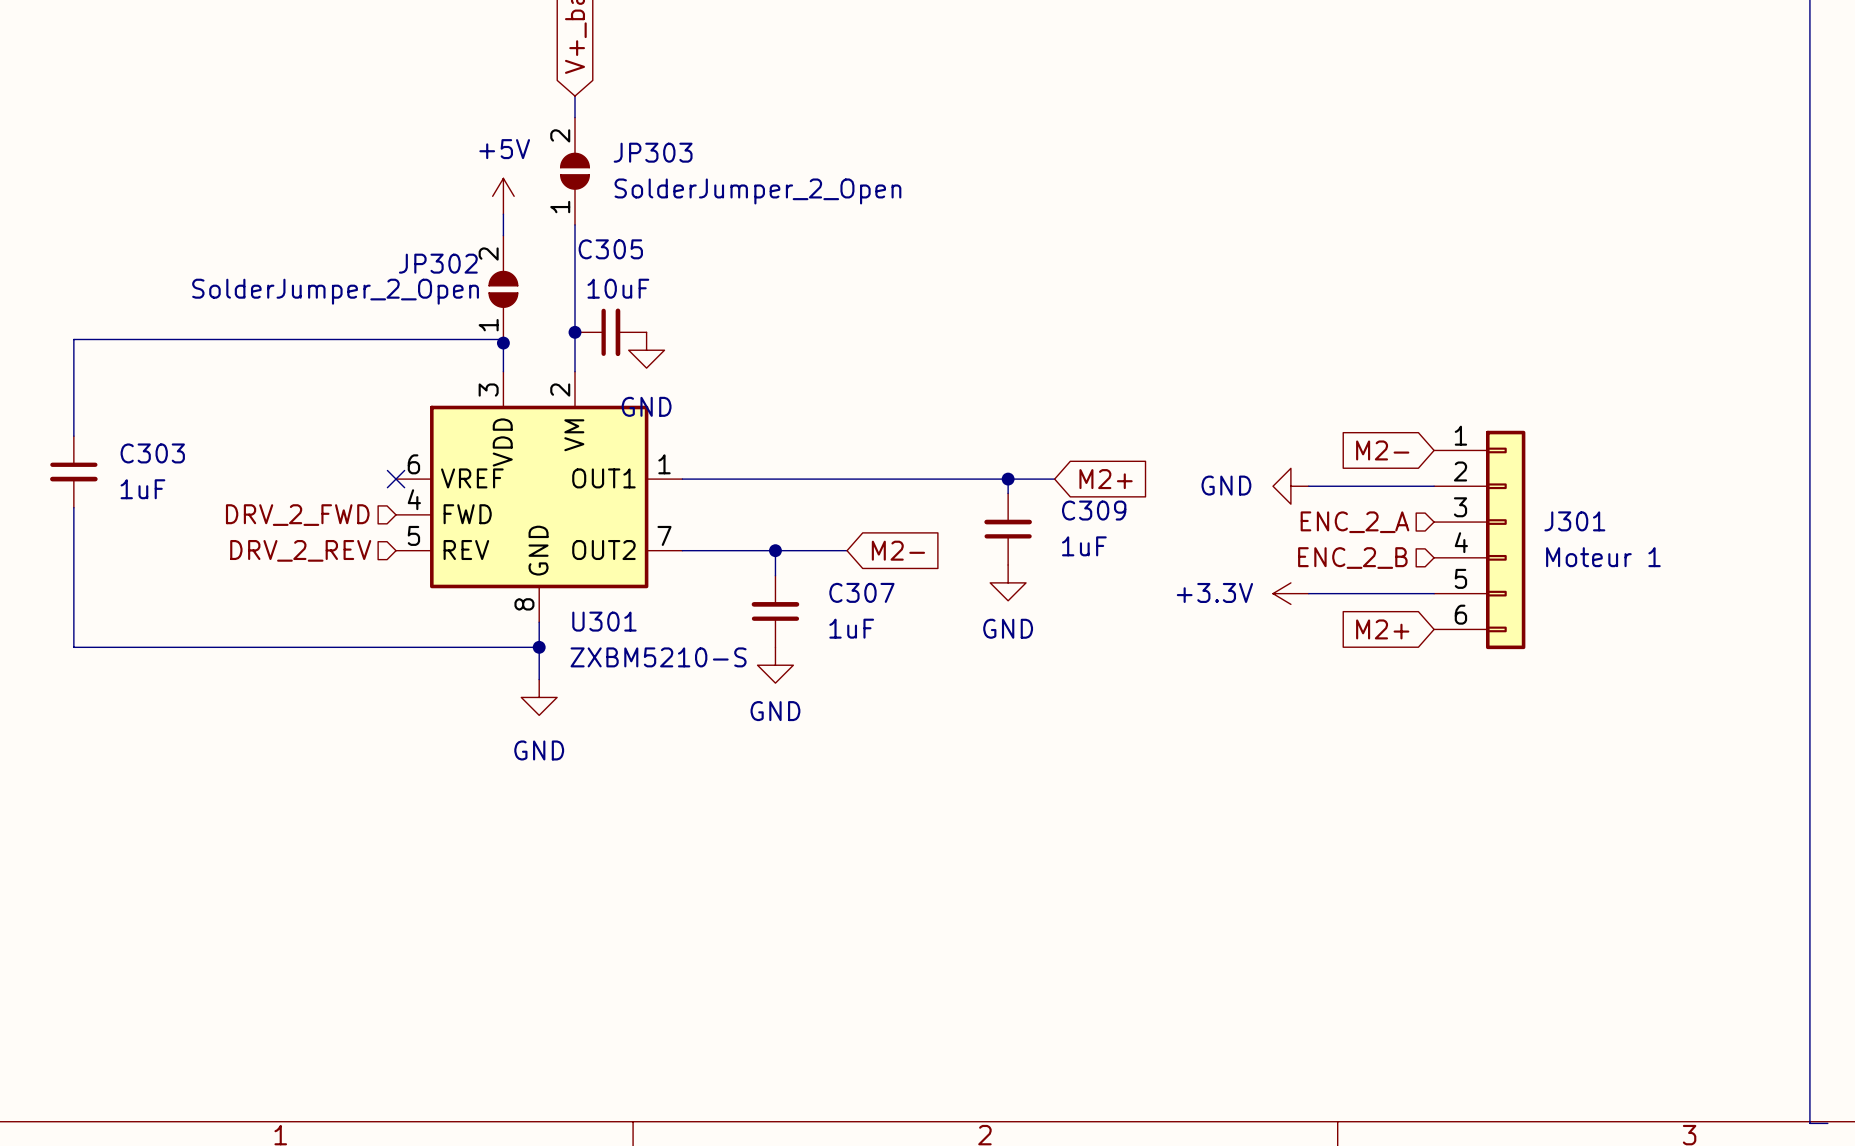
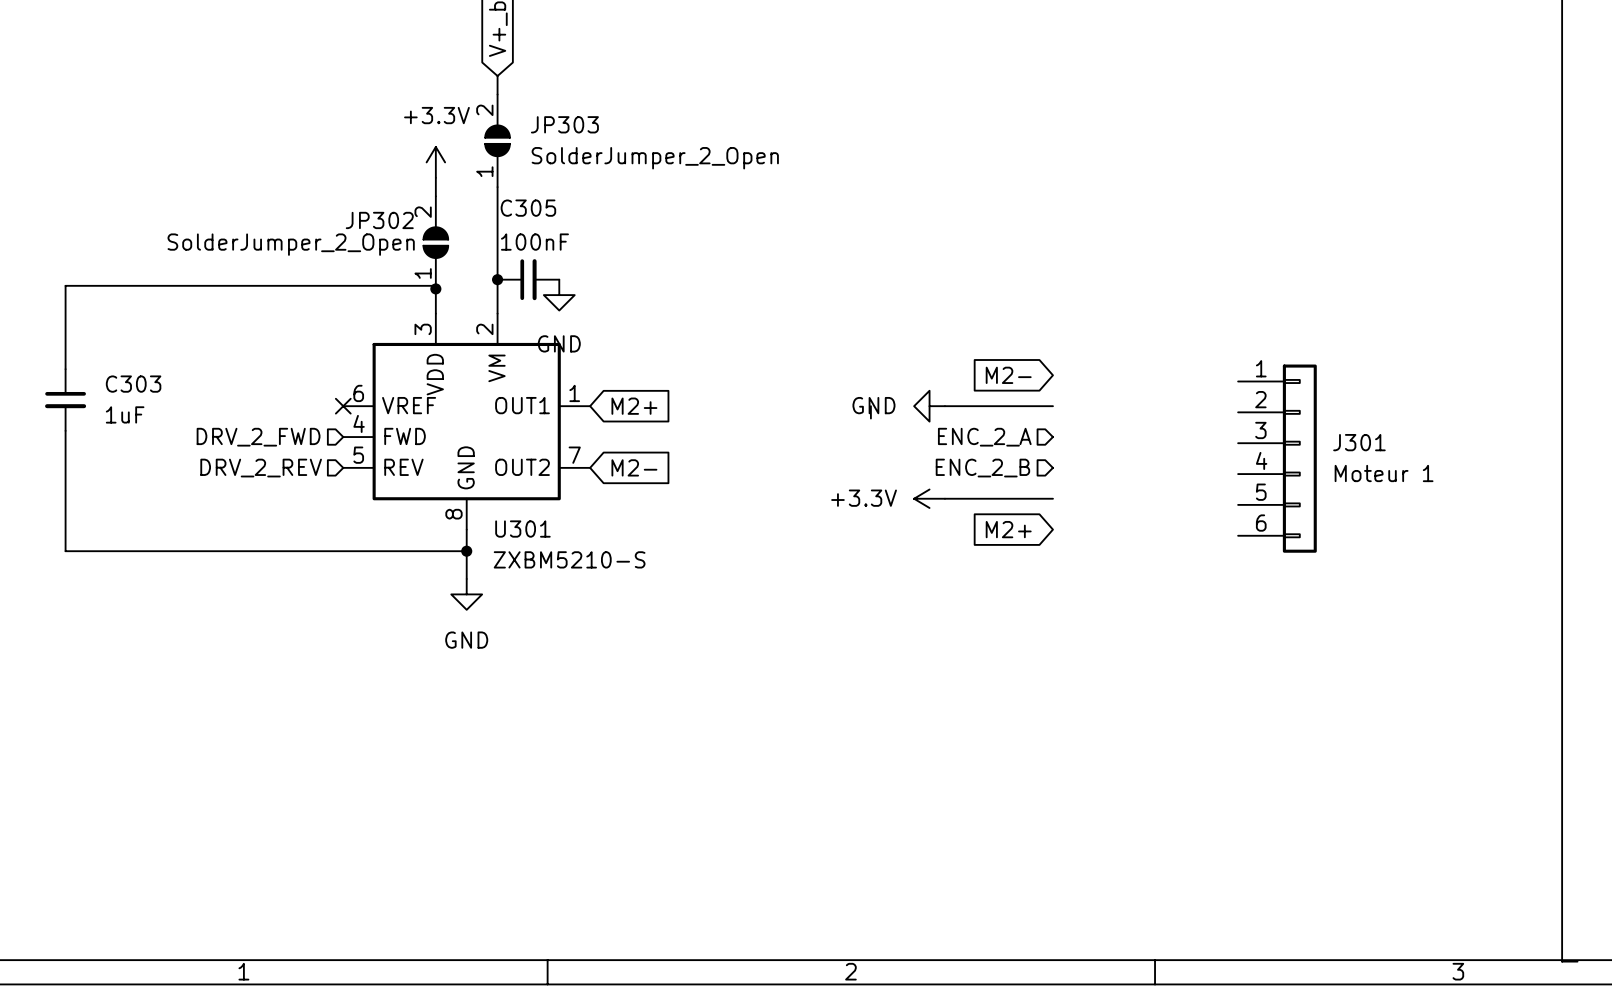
power symbol: +5V (503, 196) -> +3.3V (435, 162)
C305 value: 10uF (618, 288) -> 100nF (534, 242)
global label: M2- (1382, 450) -> none
wire: (682, 479) (1054, 479) -> none
global label: none -> M2+ (634, 406)
junction: (1008, 479) -> none
power symbol: none -> GND (929, 406)
global label: M2+ (1106, 479) -> M2- (1008, 375)
power symbol: GND (1290, 486) -> none
wire: (1308, 486) (1434, 486) -> (944, 406) (1052, 406)
hierarchical label position: ENC_2_A (1354, 522) -> ENC_2_A (984, 437)
C309: 1uF (1008, 529) -> none
wire: (682, 550) (847, 550) -> none
wire: (775, 550) (775, 575) -> none
junction: (775, 550) -> none
global label position: M2- (898, 550) -> M2- (634, 467)
hierarchical label position: ENC_2_B (1352, 558) -> ENC_2_B (982, 468)
power symbol: GND (1008, 582) -> none
power symbol position: +3.3V (1290, 593) -> +3.3V (929, 498)
wire: (1308, 593) (1434, 593) -> (944, 498) (1052, 498)
C307: 1uF (775, 611) -> none
global label: none -> M2+ (1008, 529)
global label: M2+ (1382, 629) -> none
power symbol: GND (775, 665) -> none

